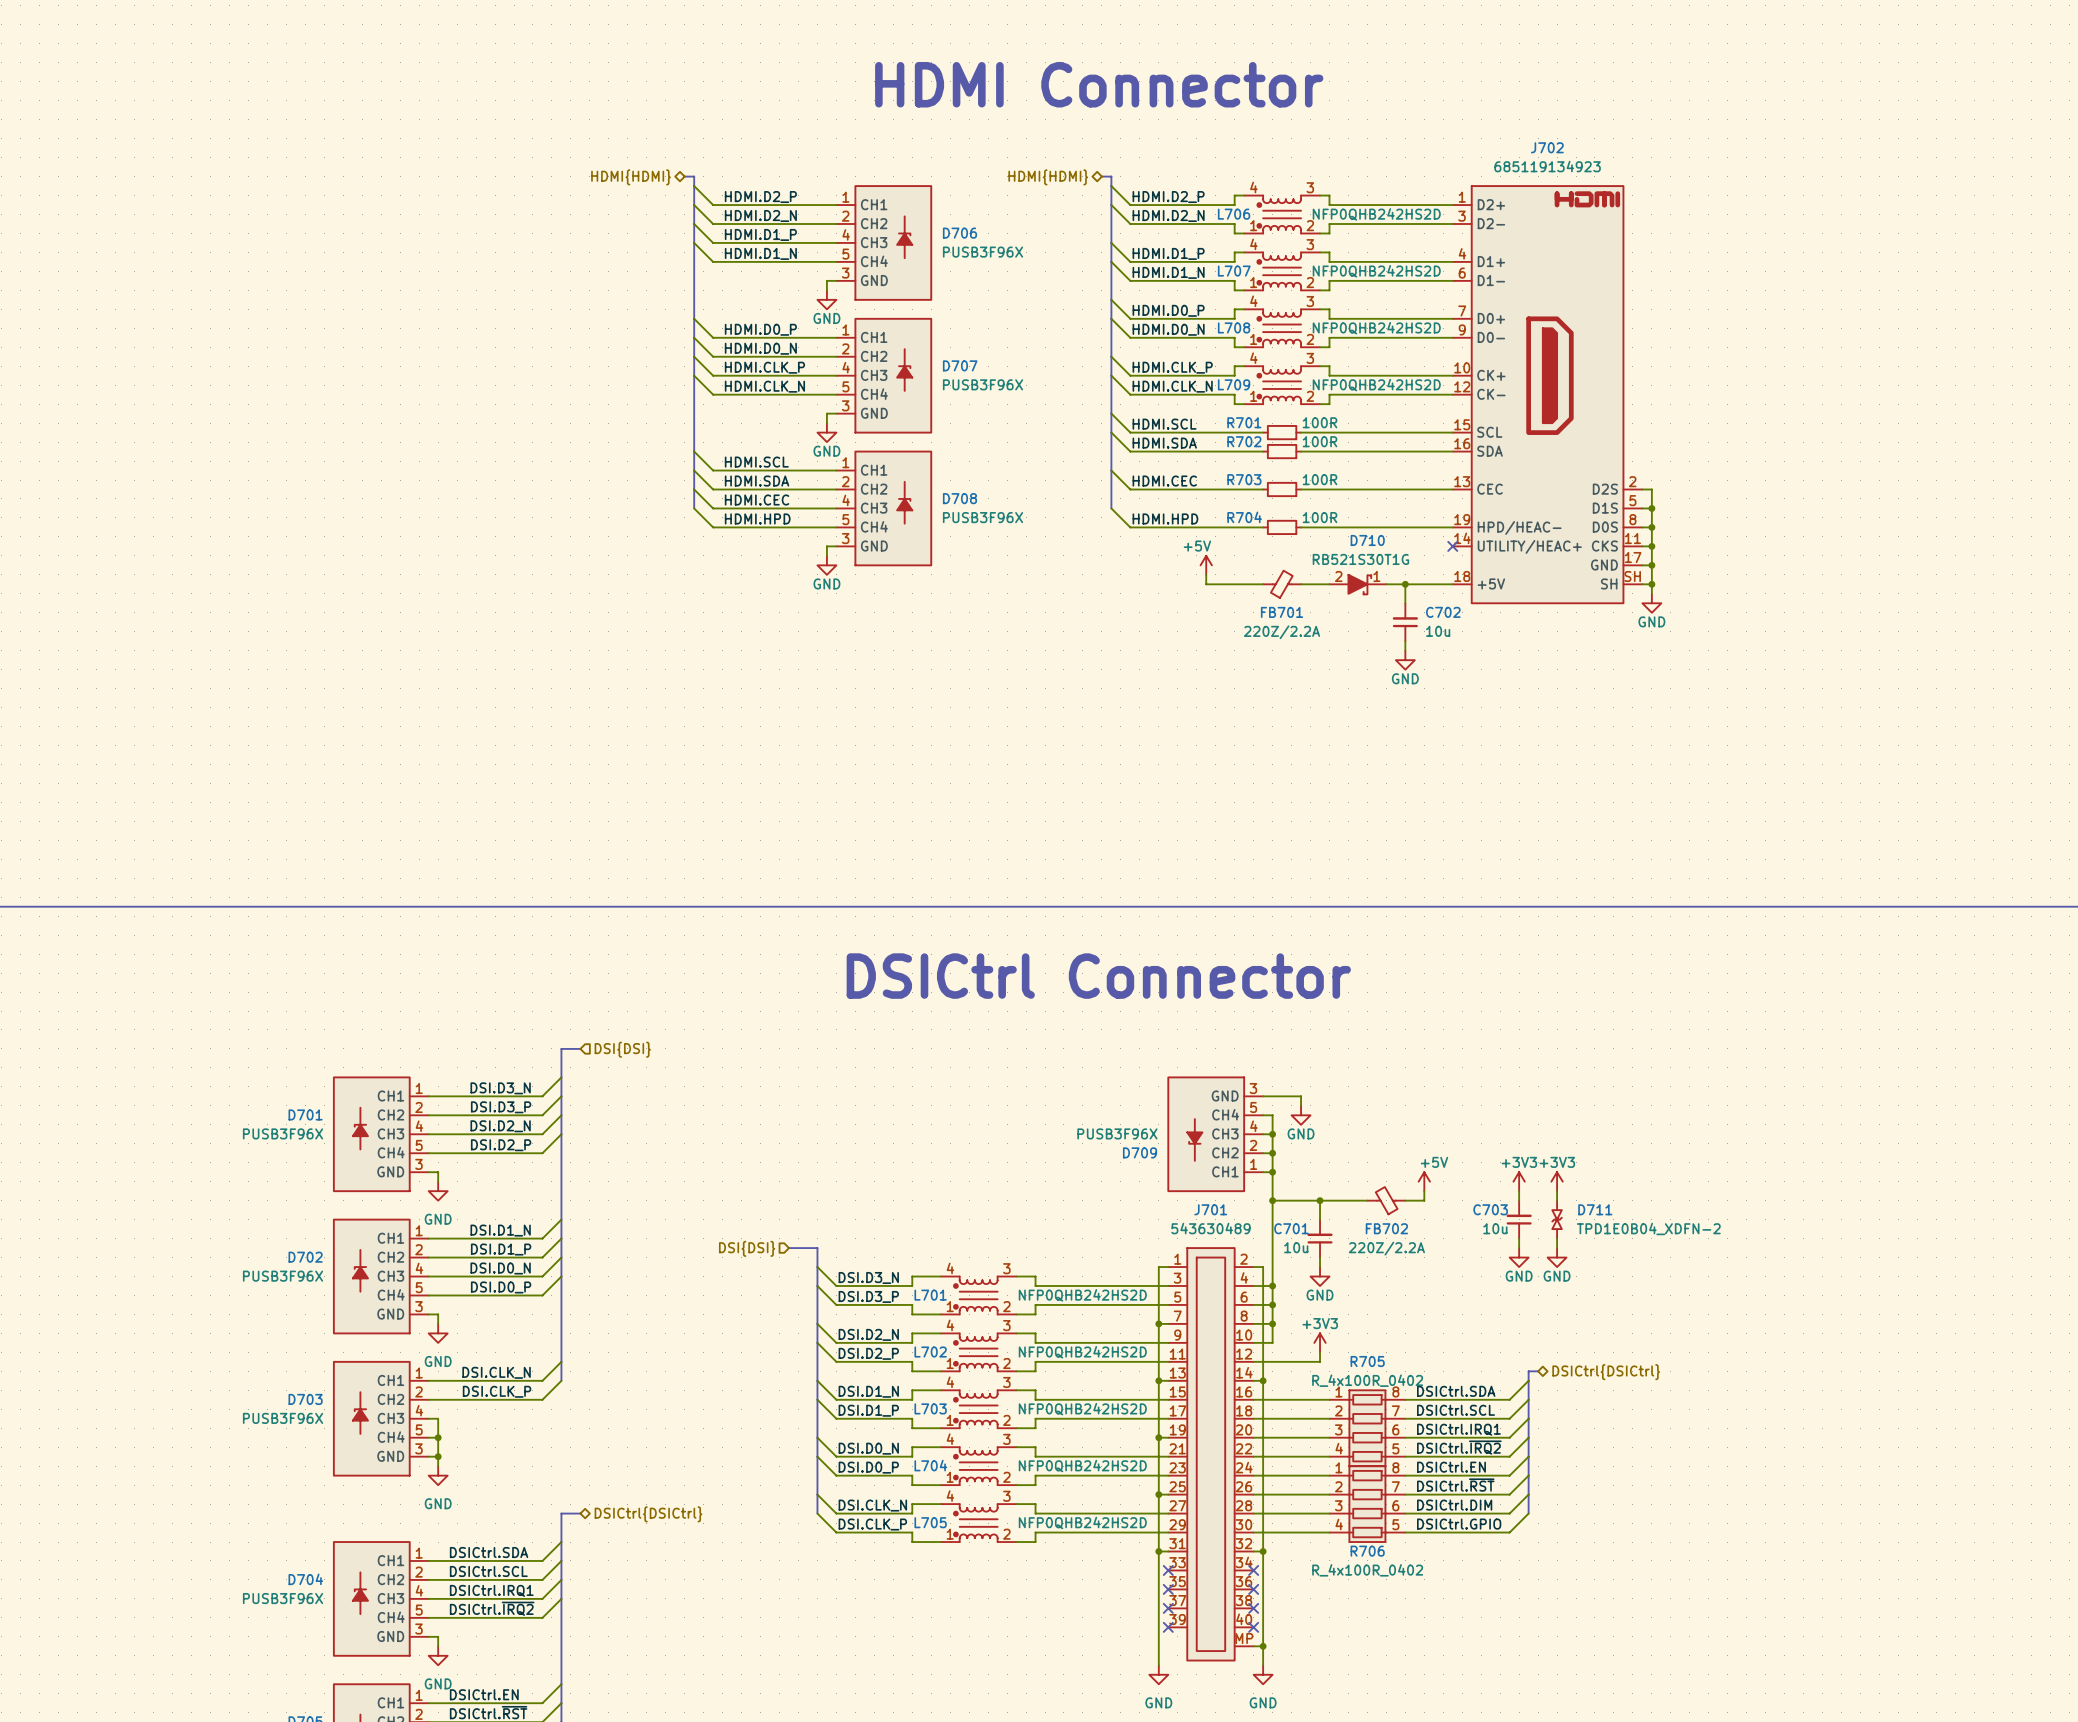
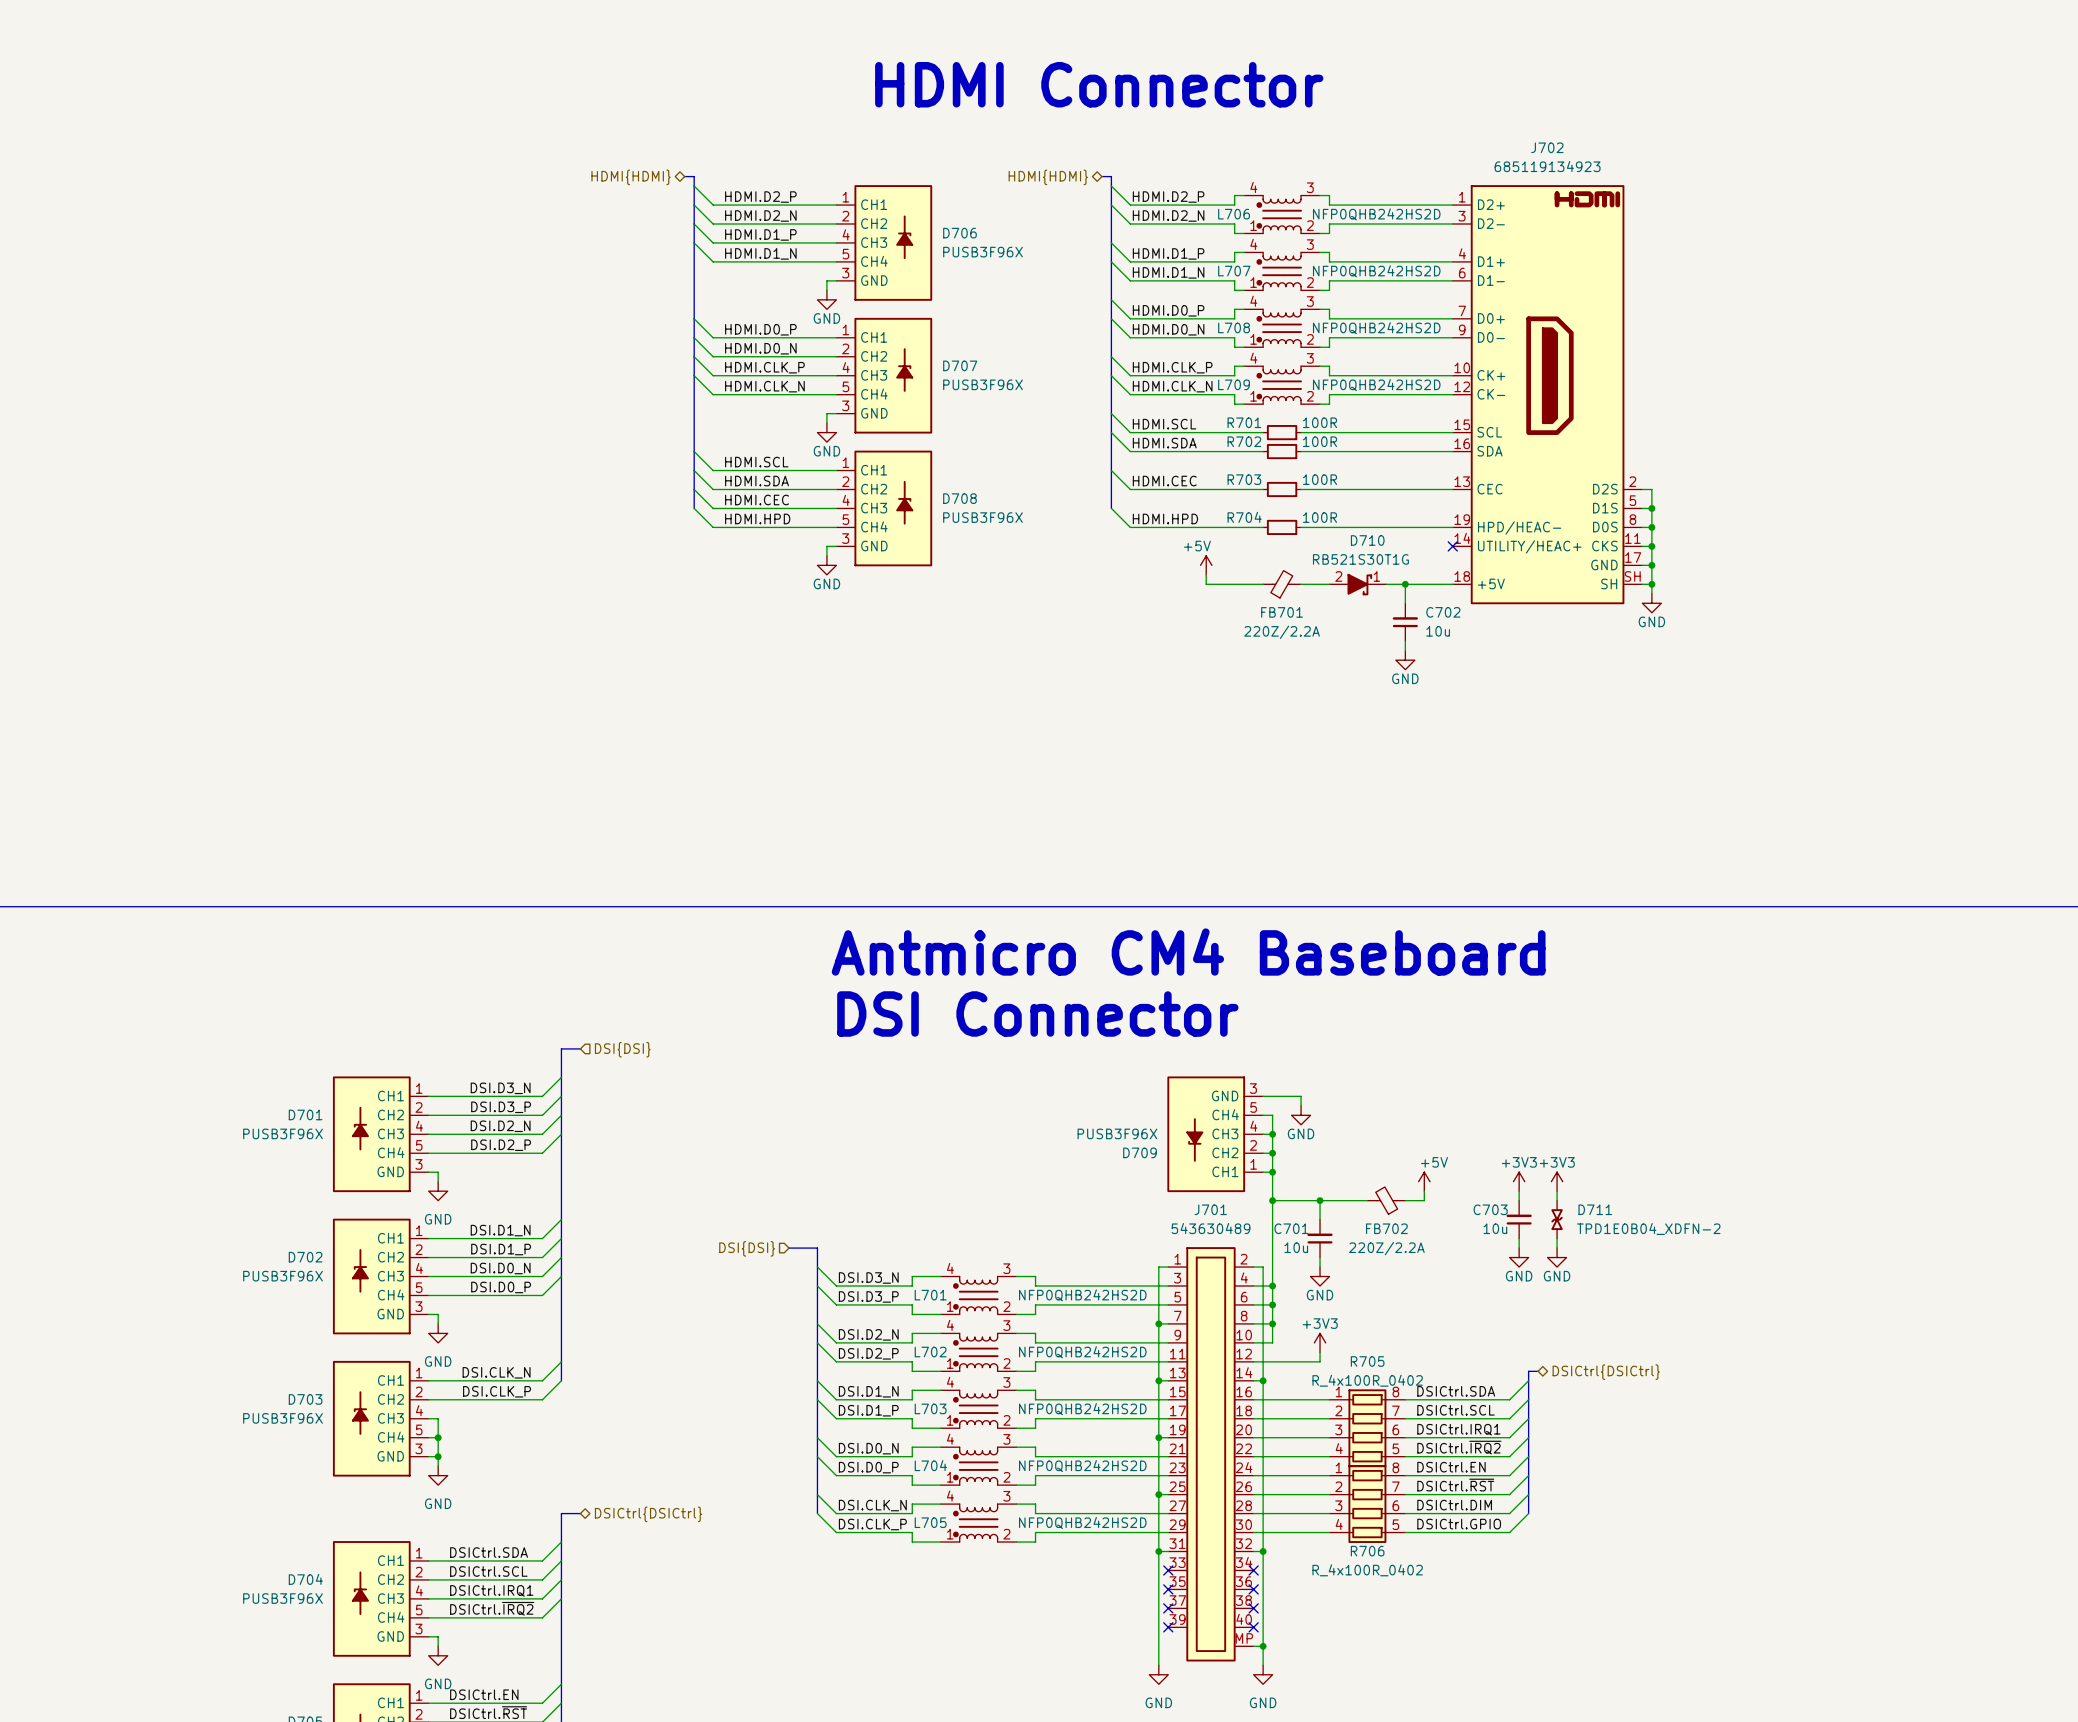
text: none -> Antmicro CM4 Baseboard (1188, 952)
text: DSICtrl Connector (1098, 976) -> DSI Connector (1037, 1013)

